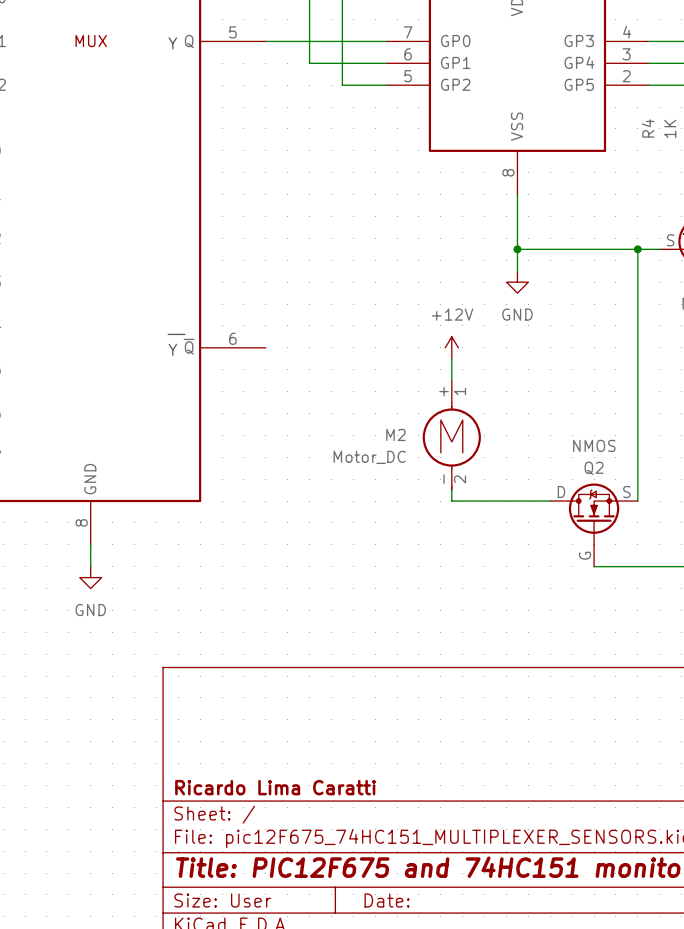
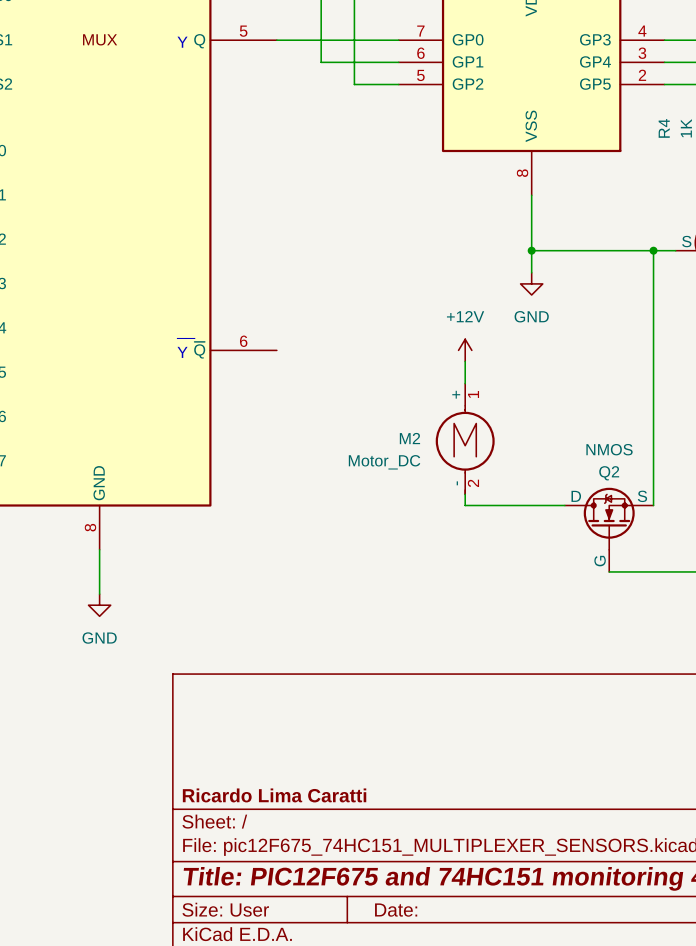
power symbol position: GND (90, 577) -> GND (99, 605)

